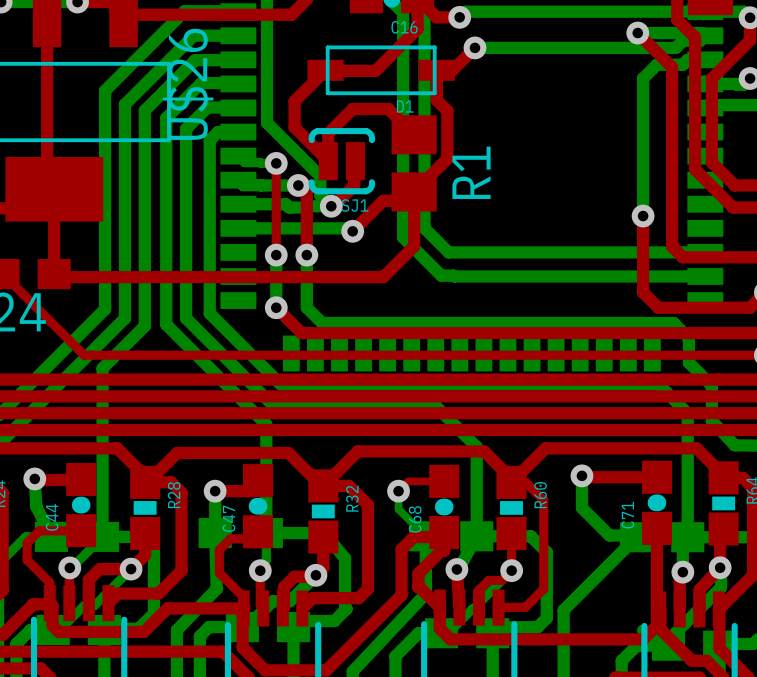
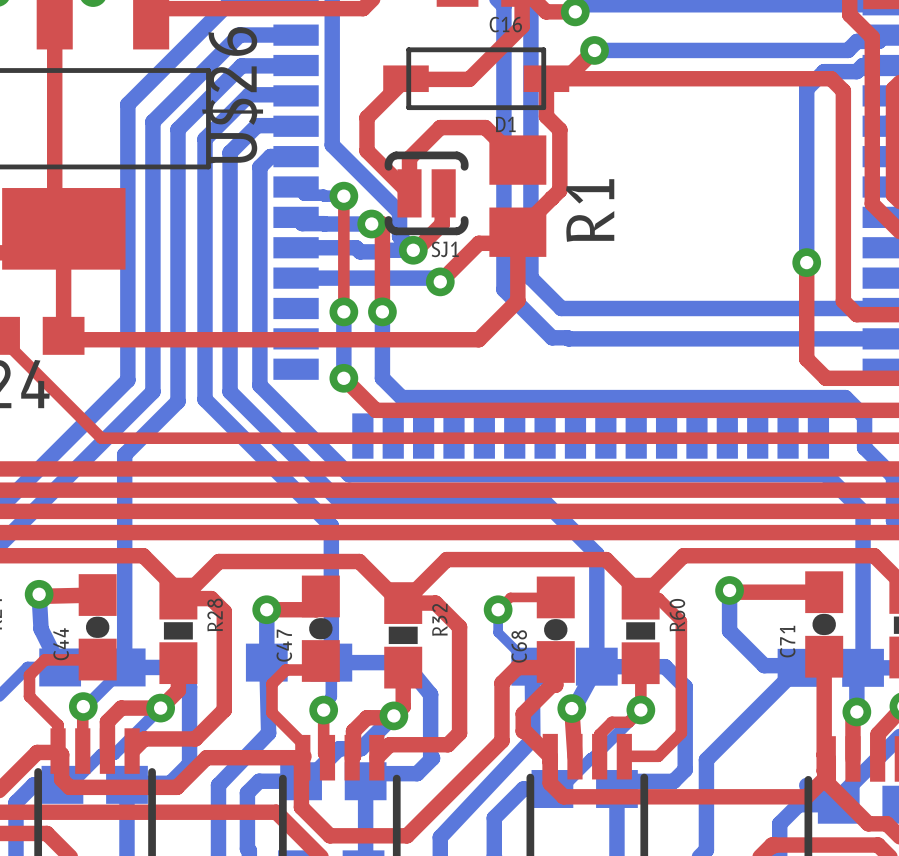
bottom track: (637, 33) (702, 33) (705, 35) -> none
top track: (637, 33) (672, 67) (672, 80) -> (566, 78) (831, 78) (843, 90)
via: (637, 33) -> none

